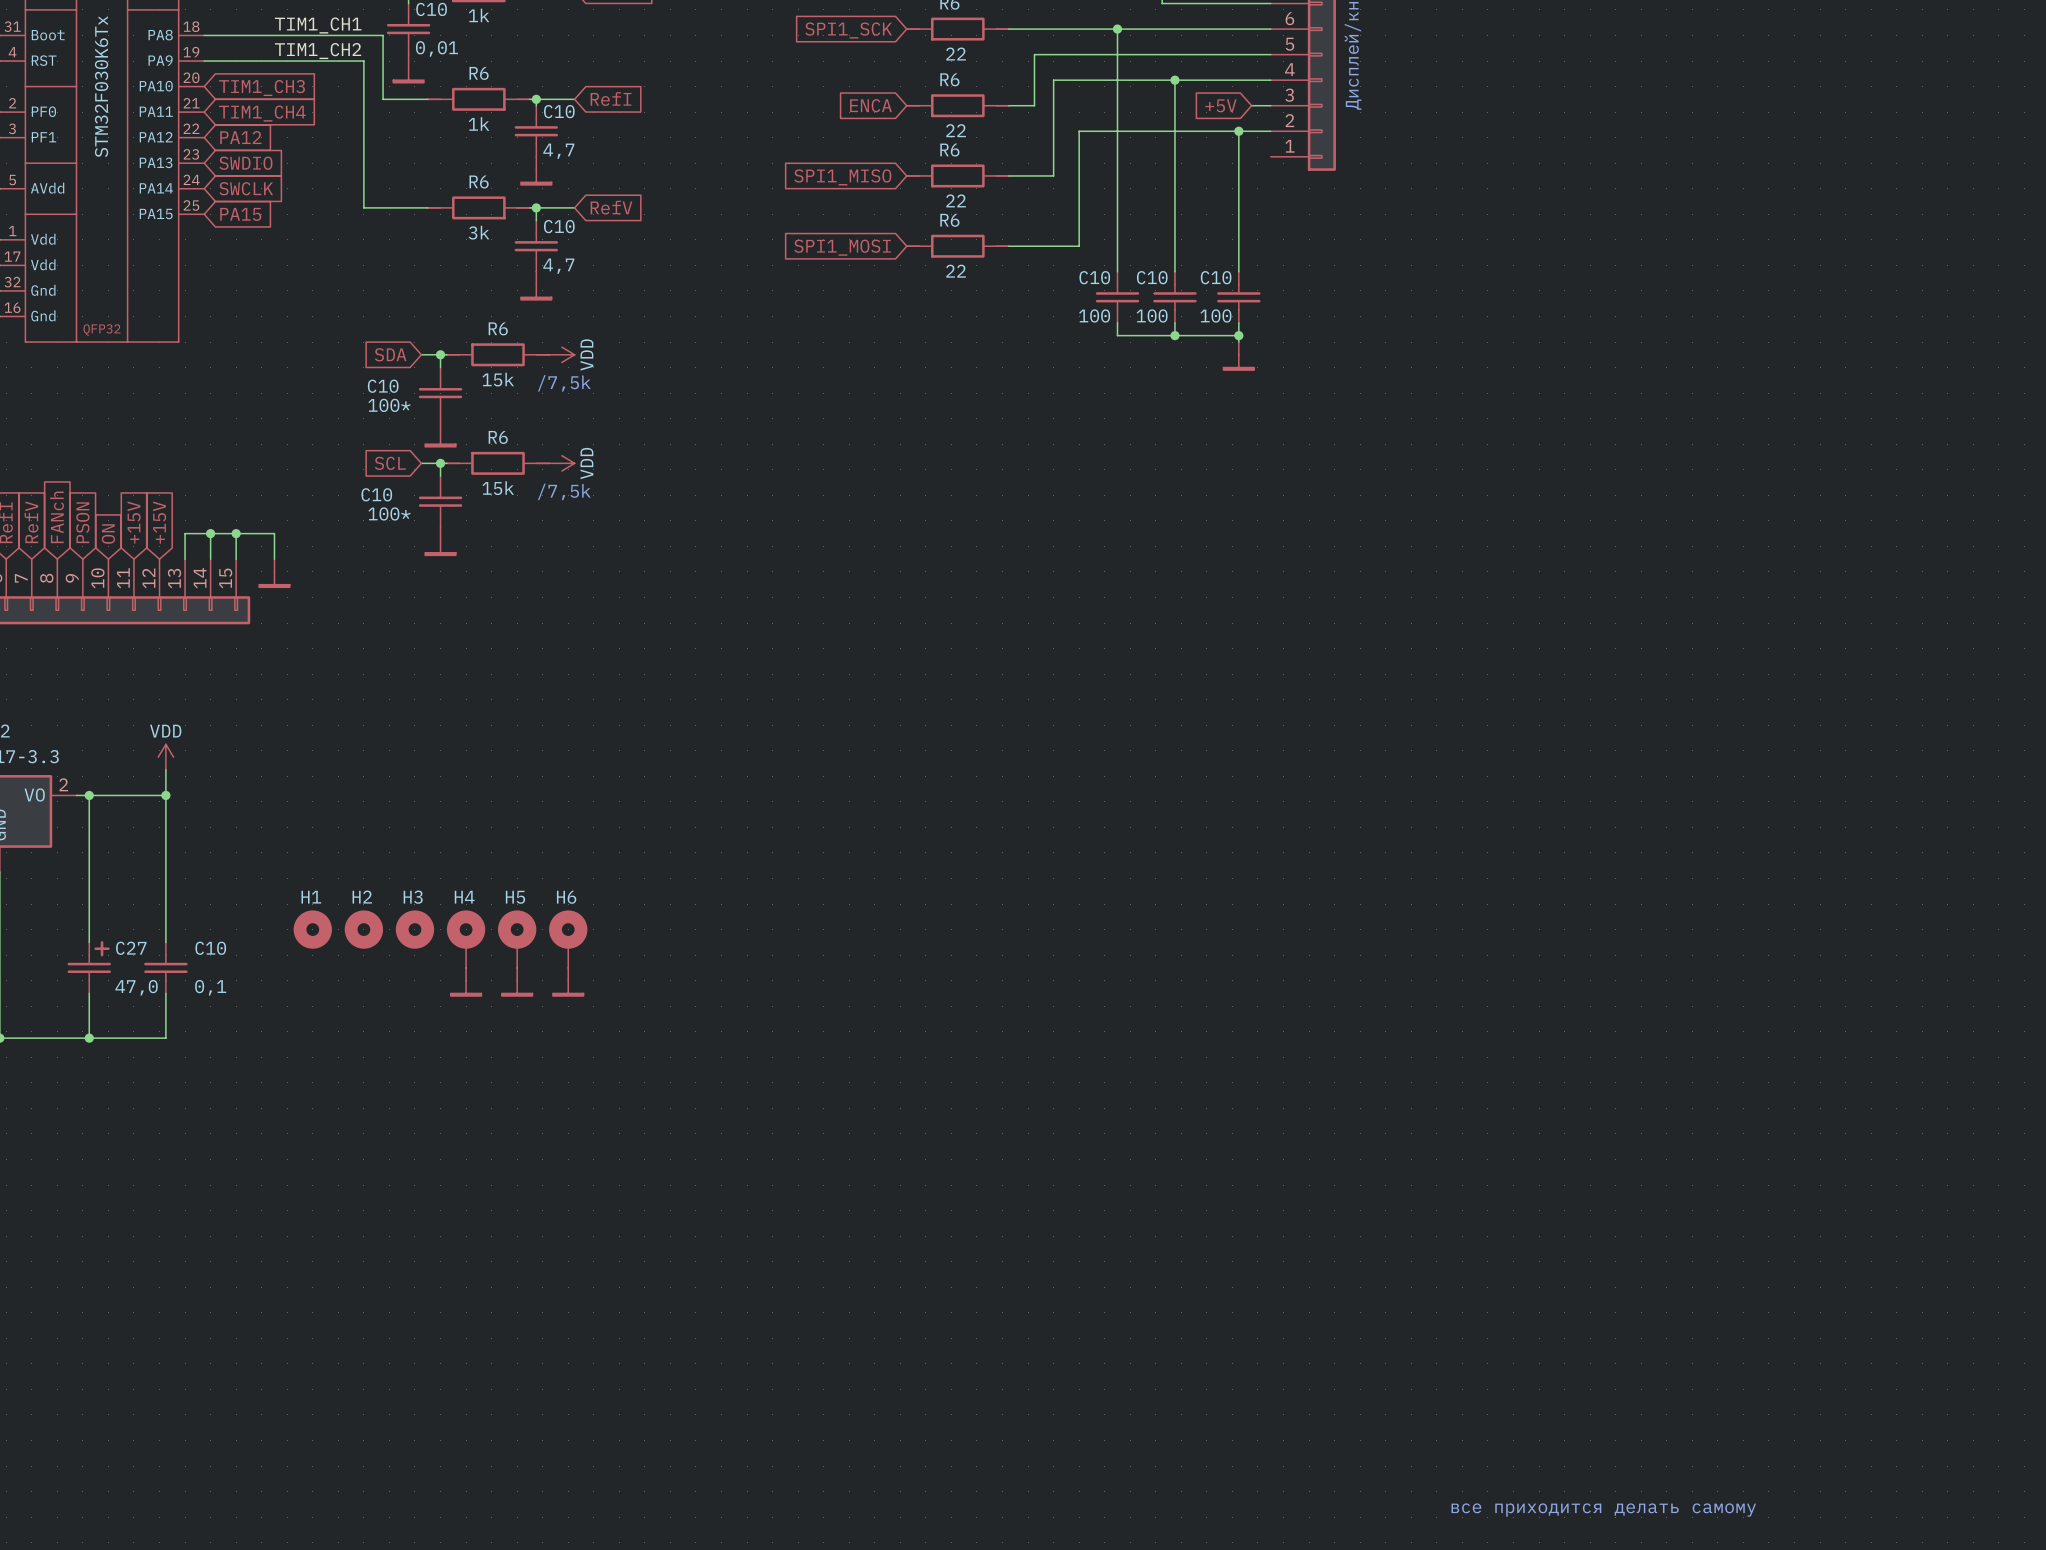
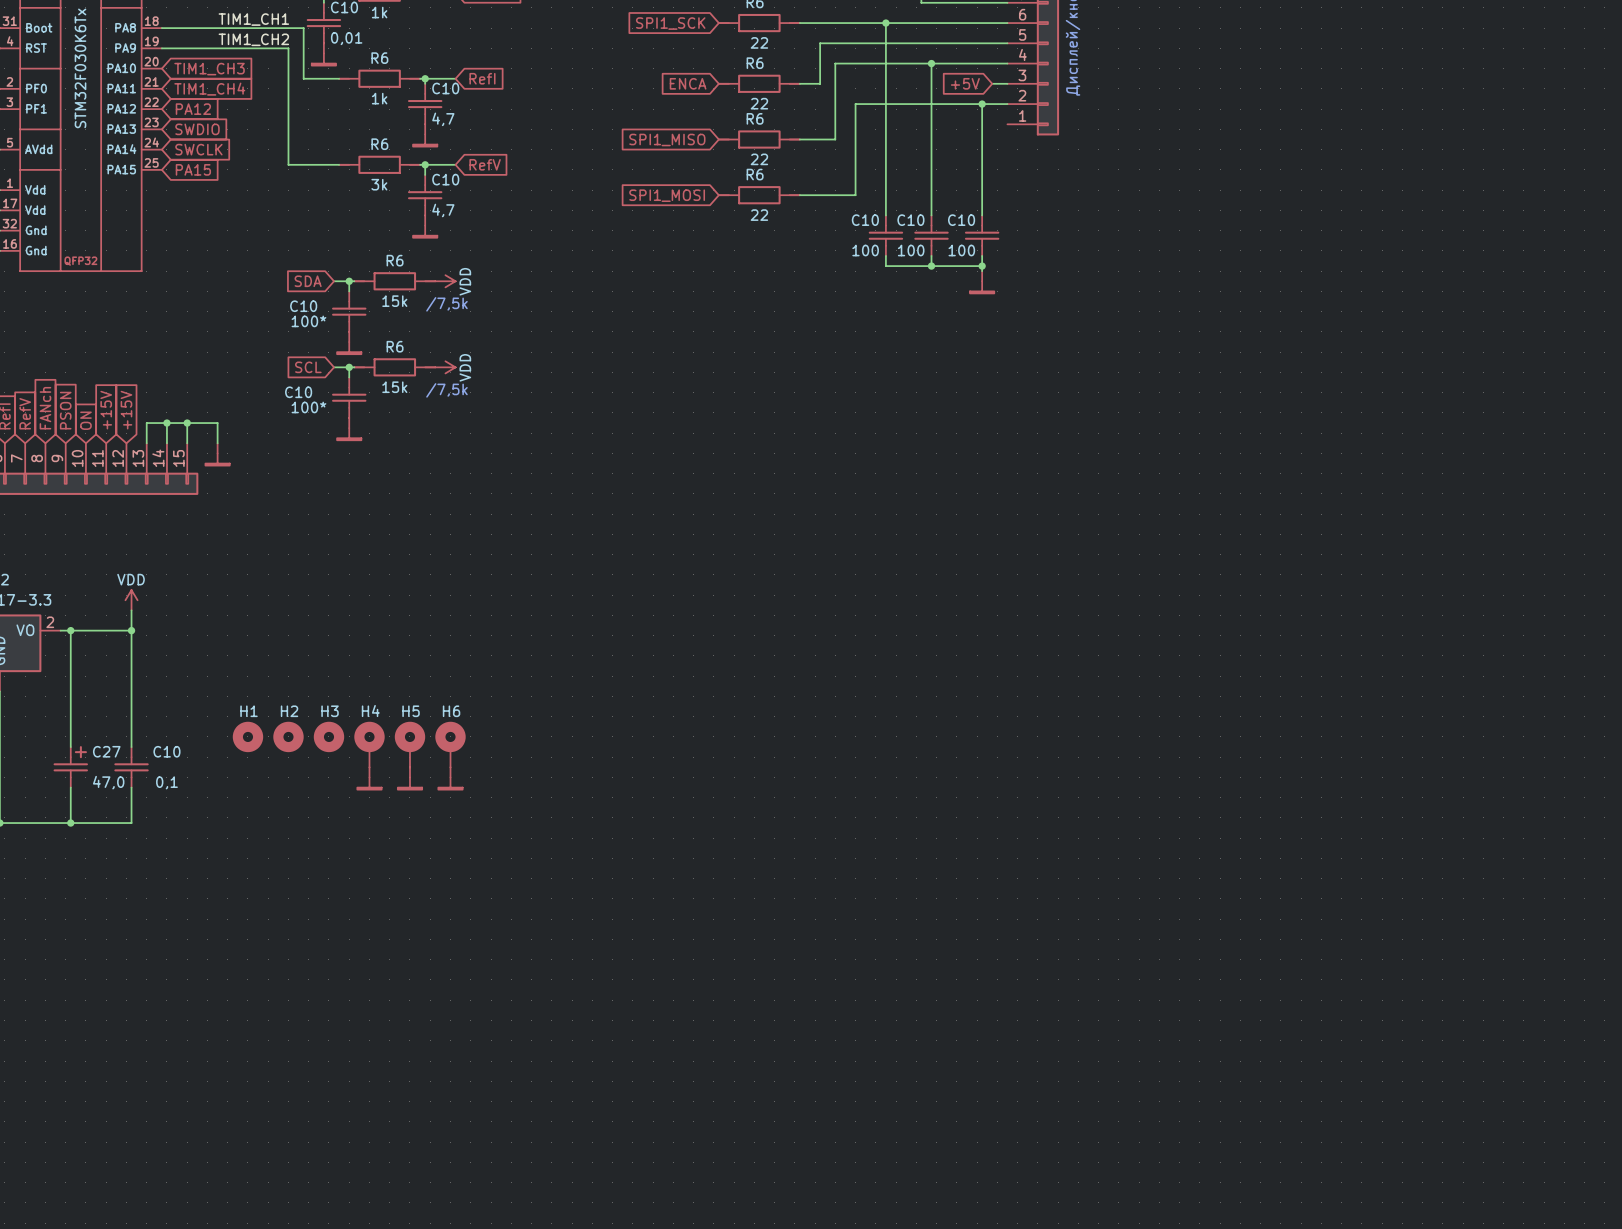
text: все приходится делать самому (1603, 1510) -> none

